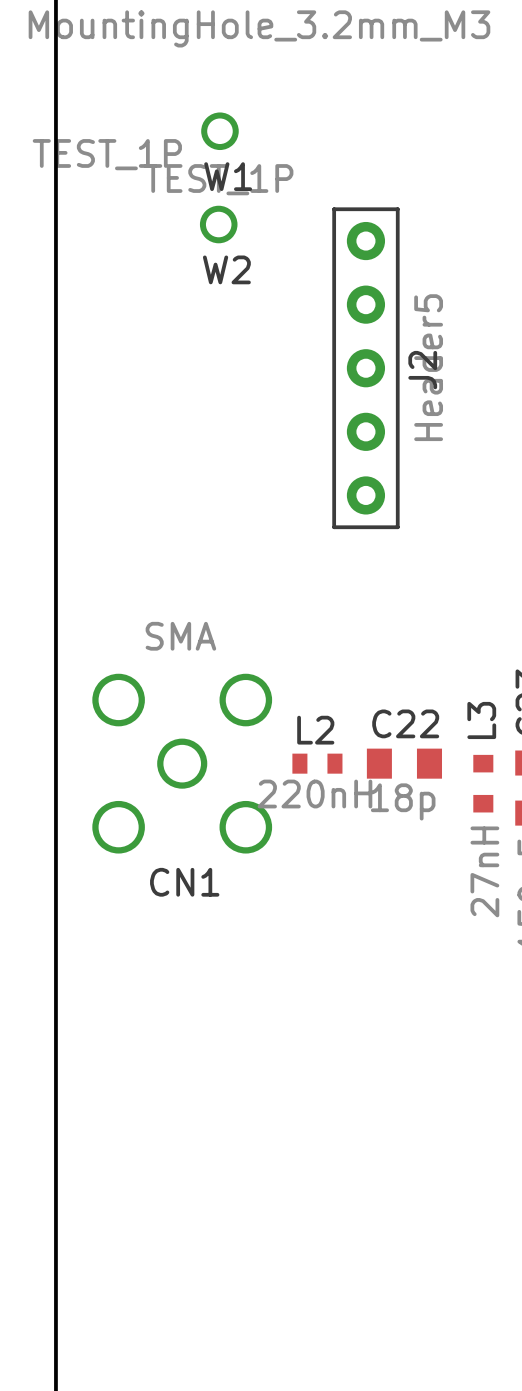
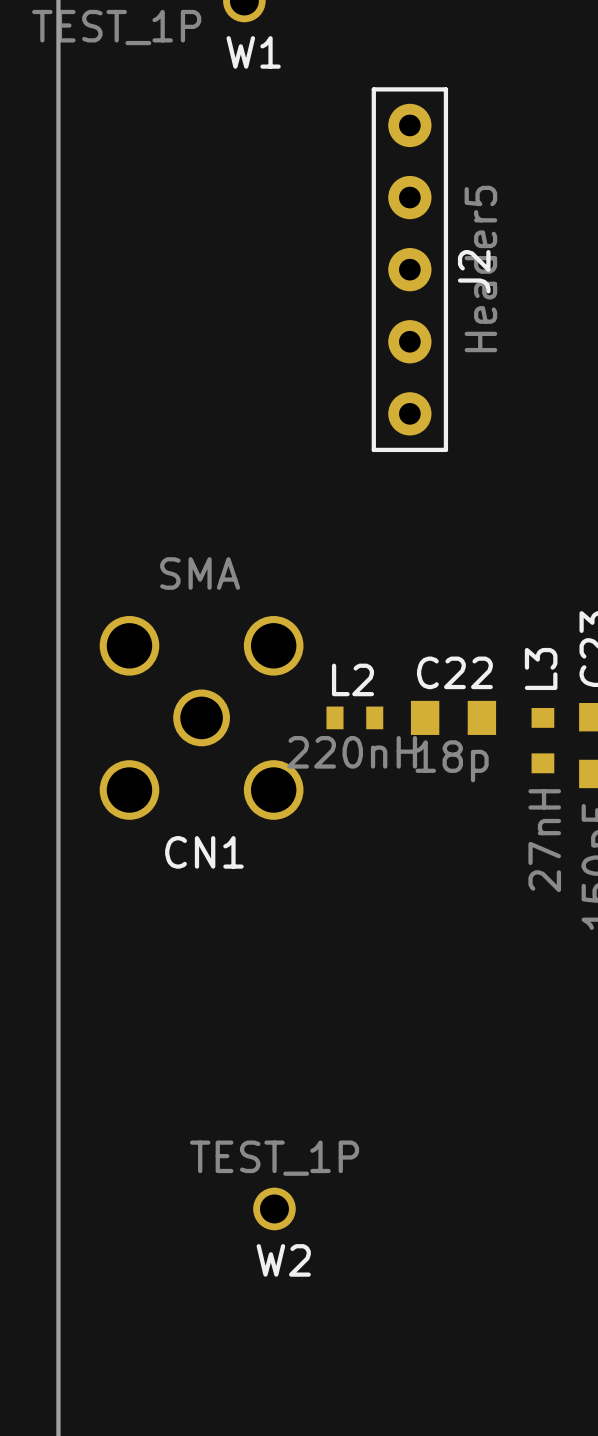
W2 position: (218, 224) -> (274, 1208)

